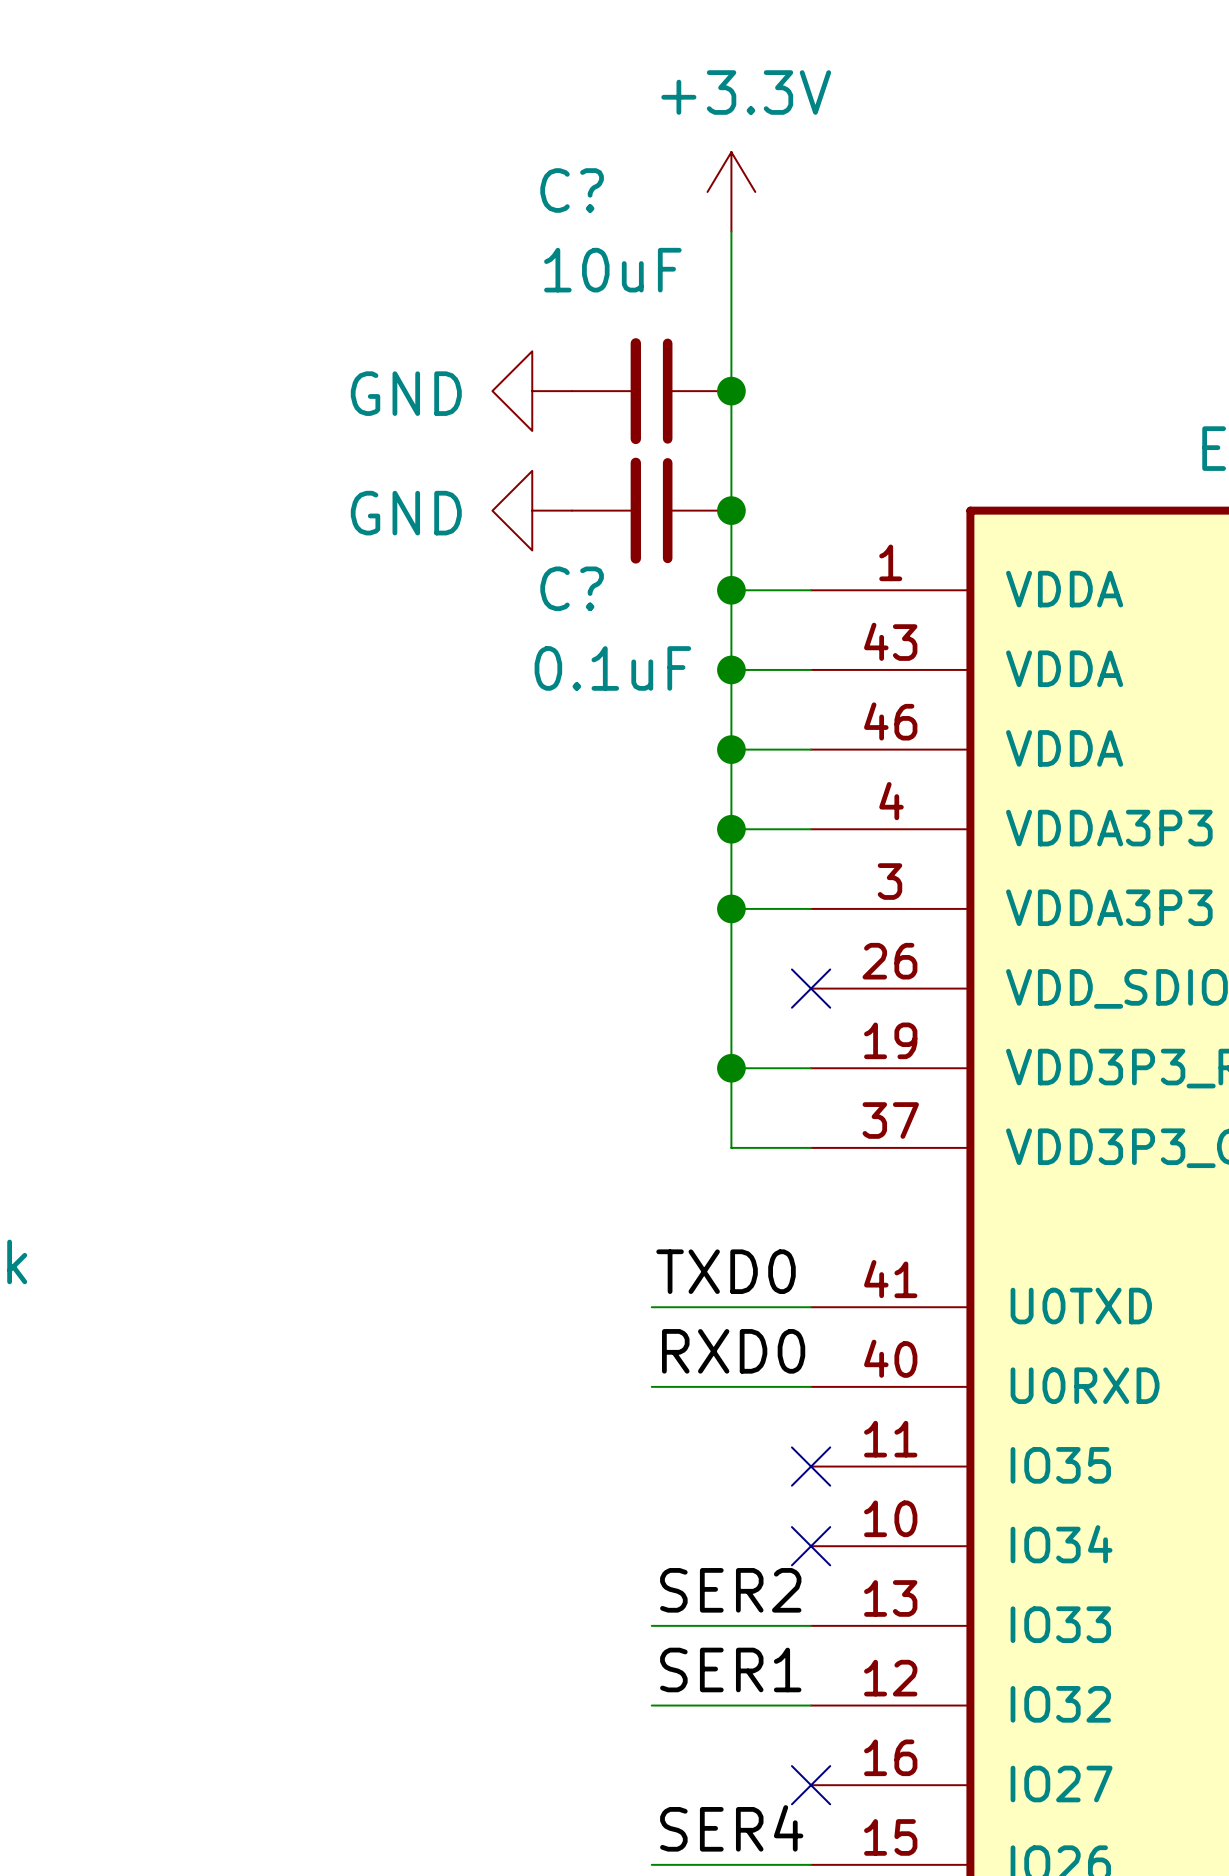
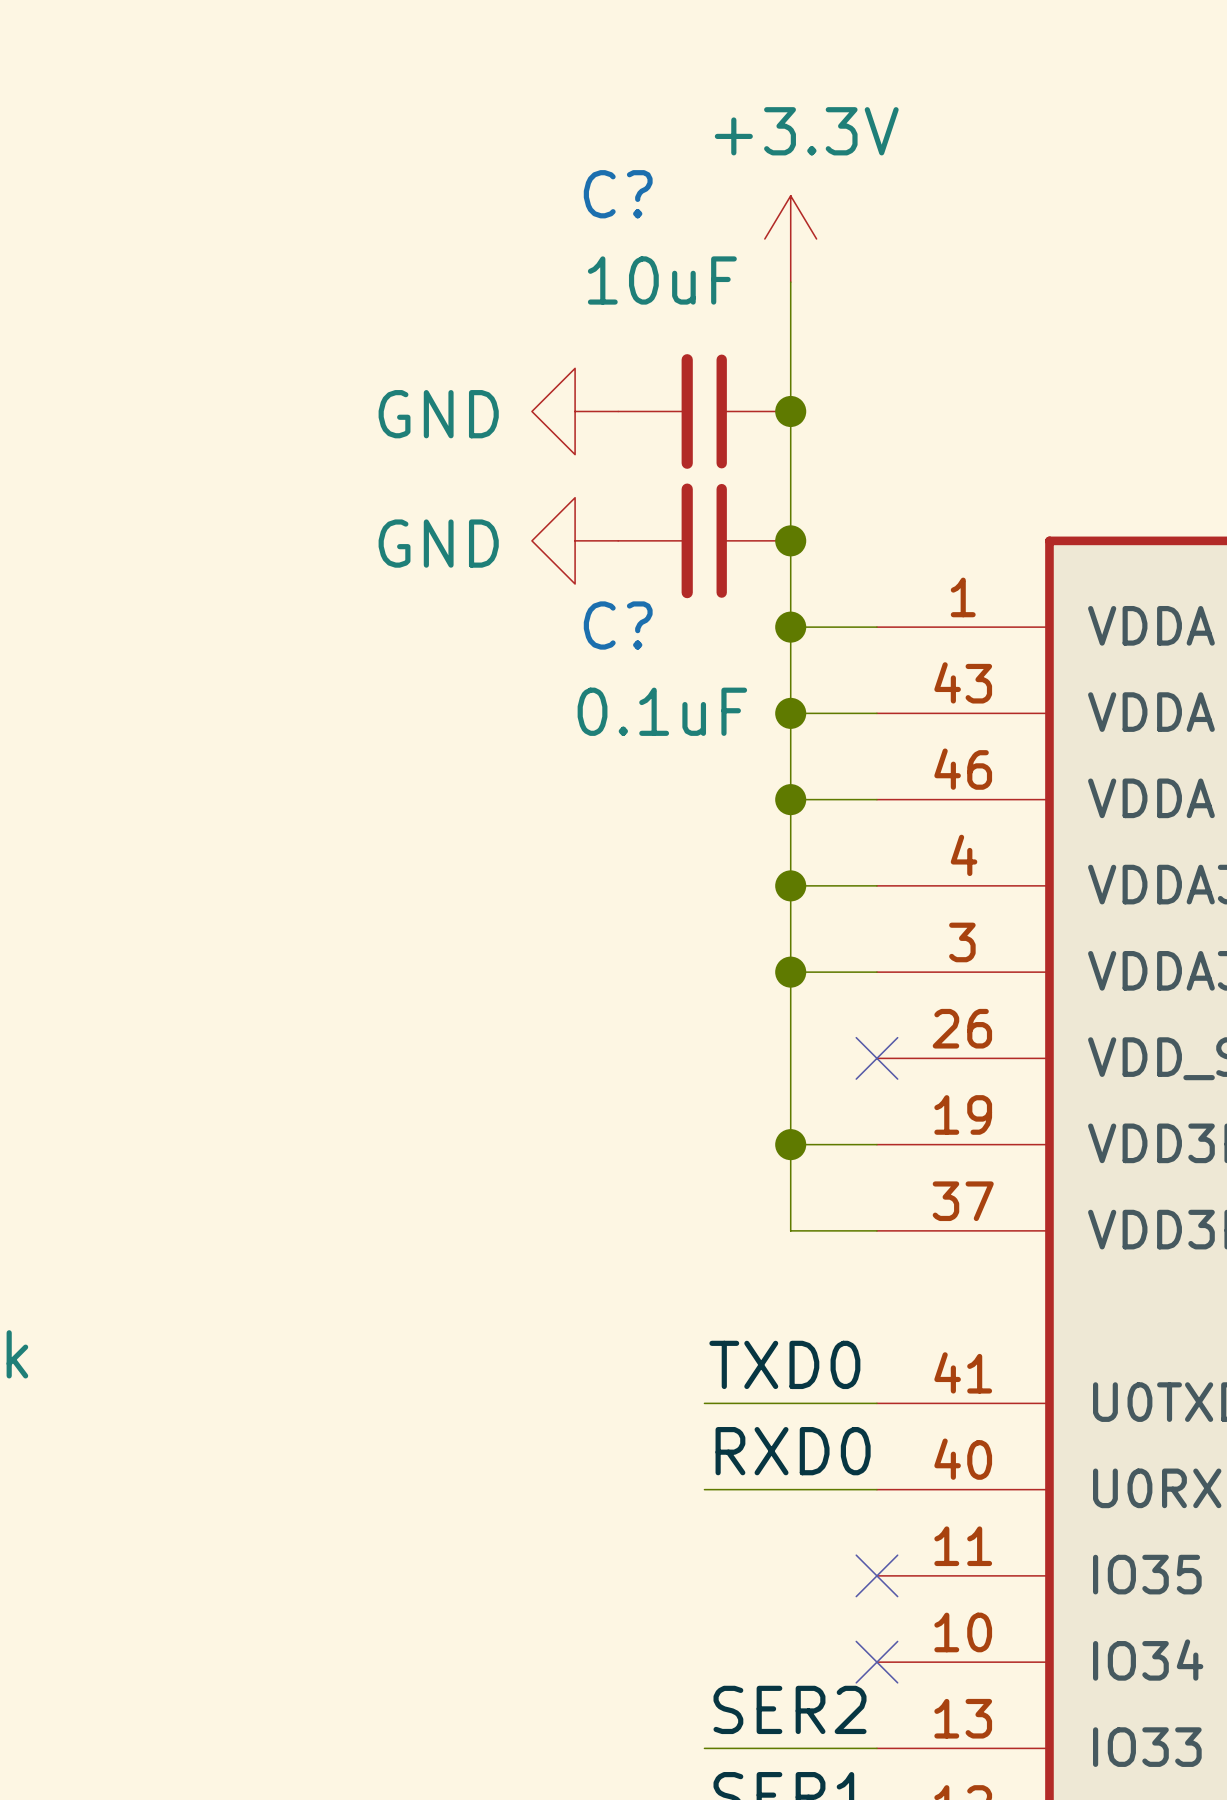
power symbol position: +3.3V (731, 191) -> +3.3V (790, 238)

